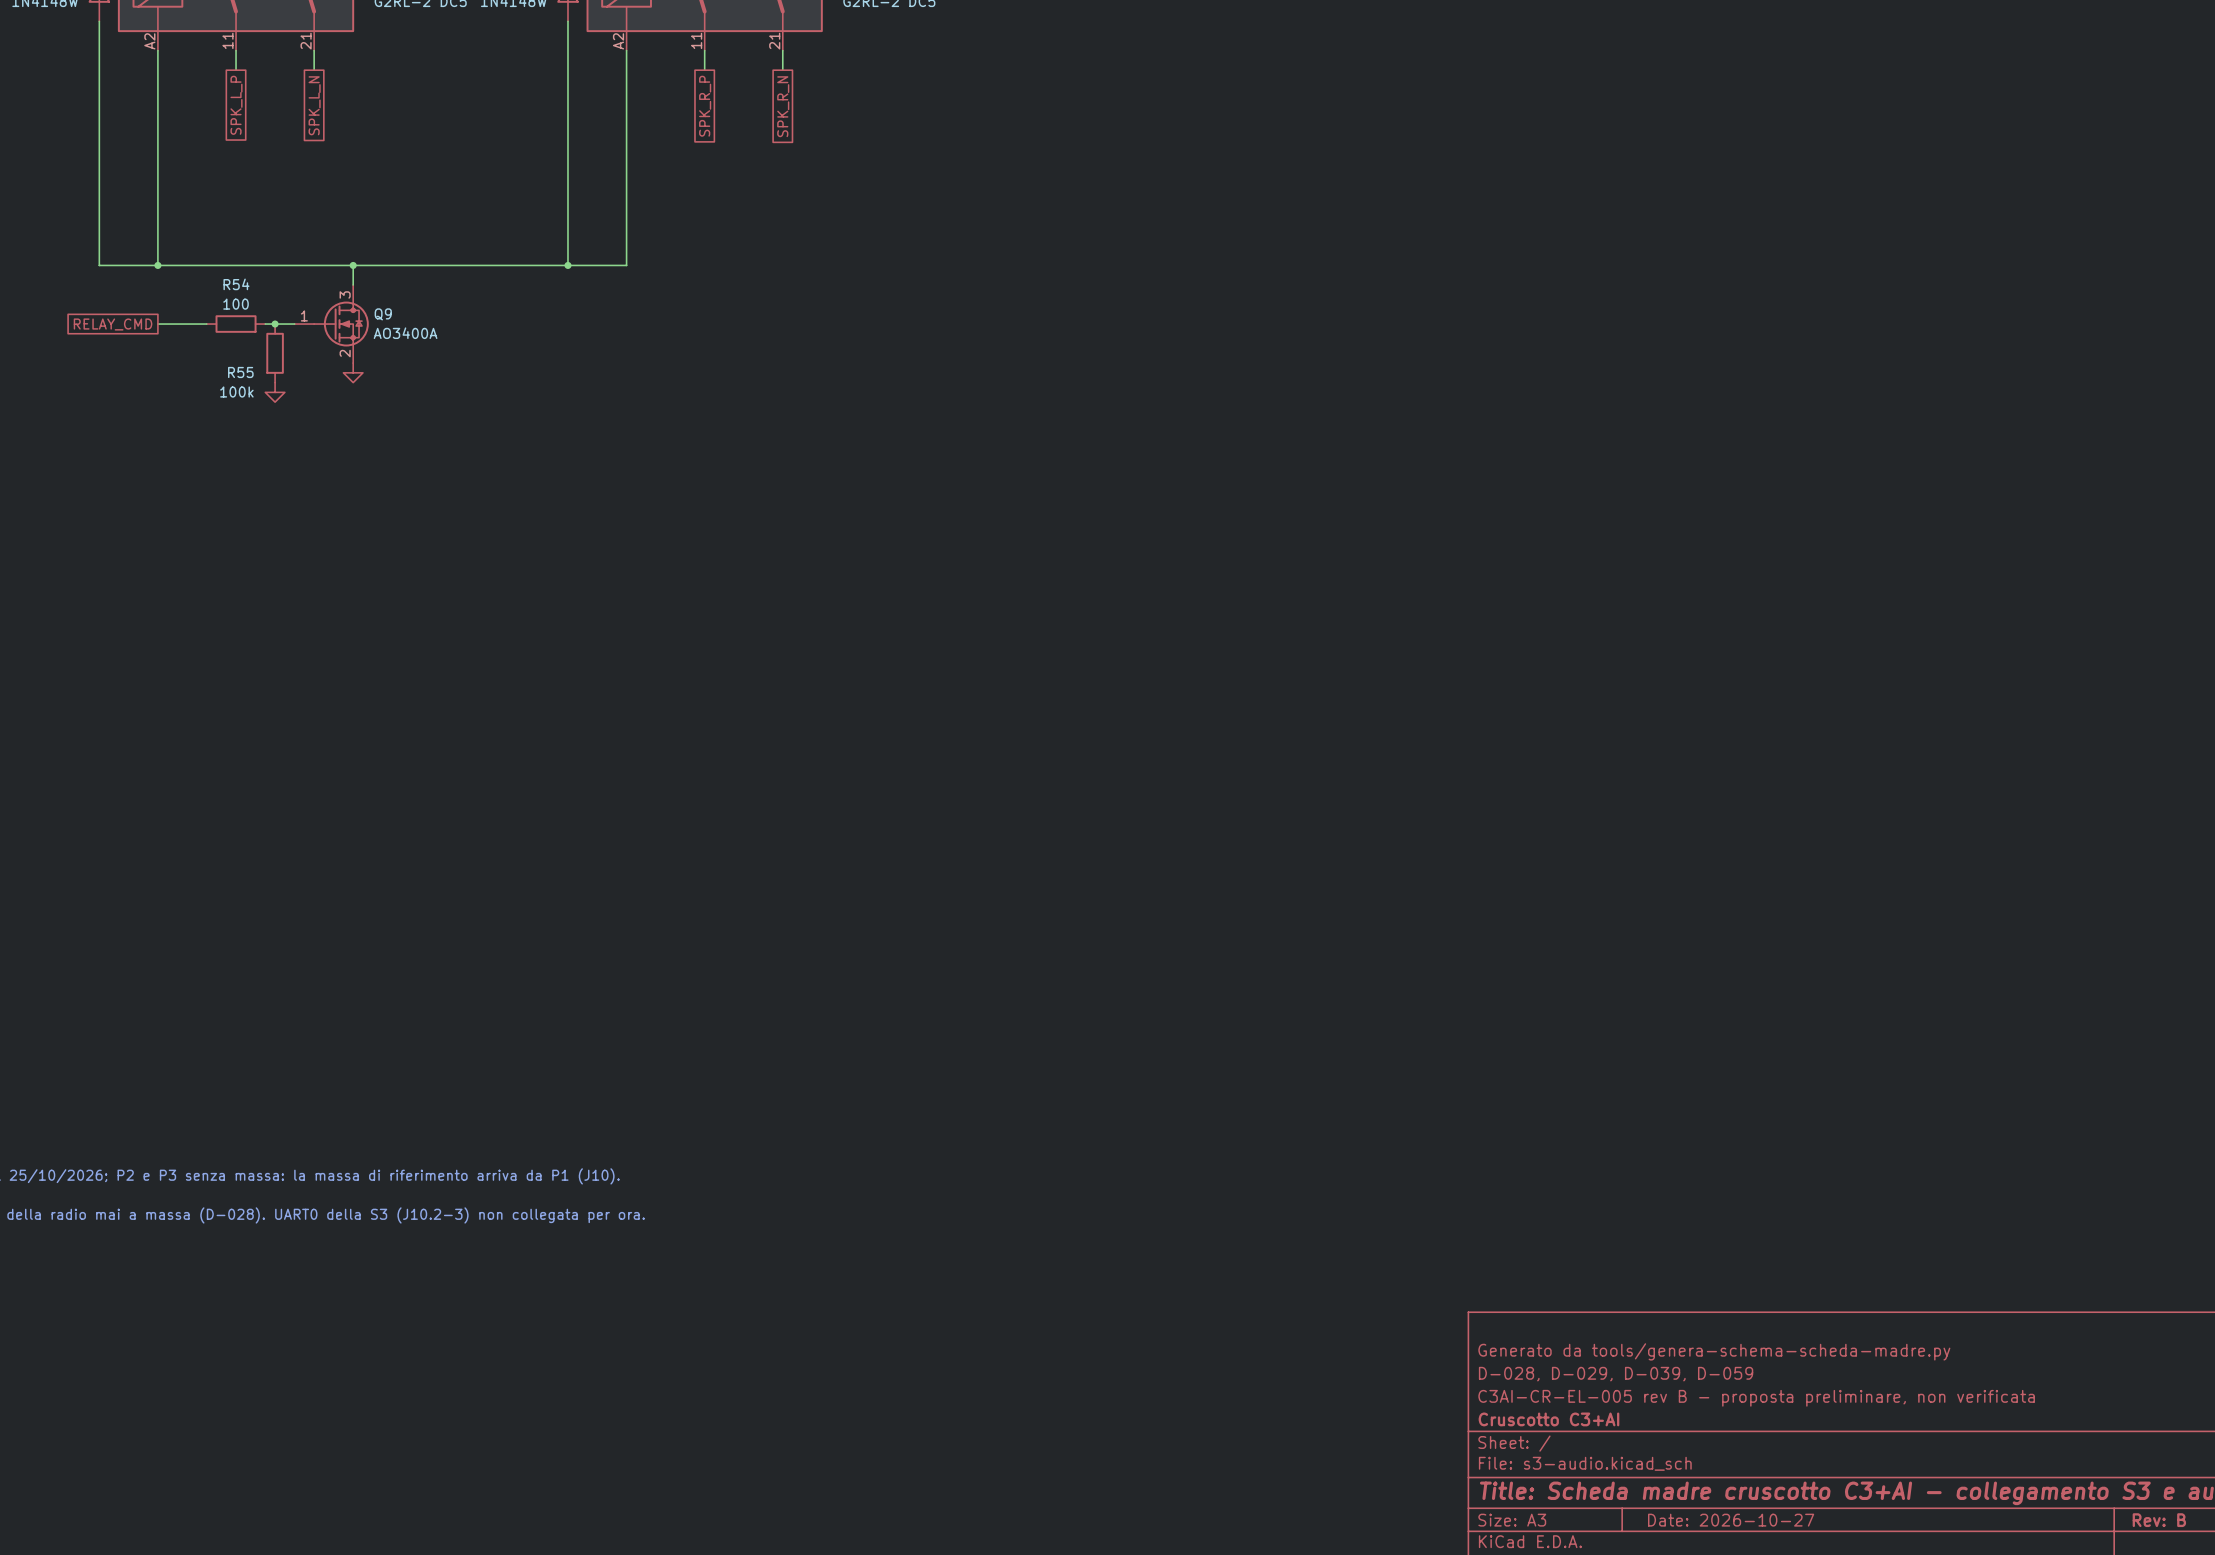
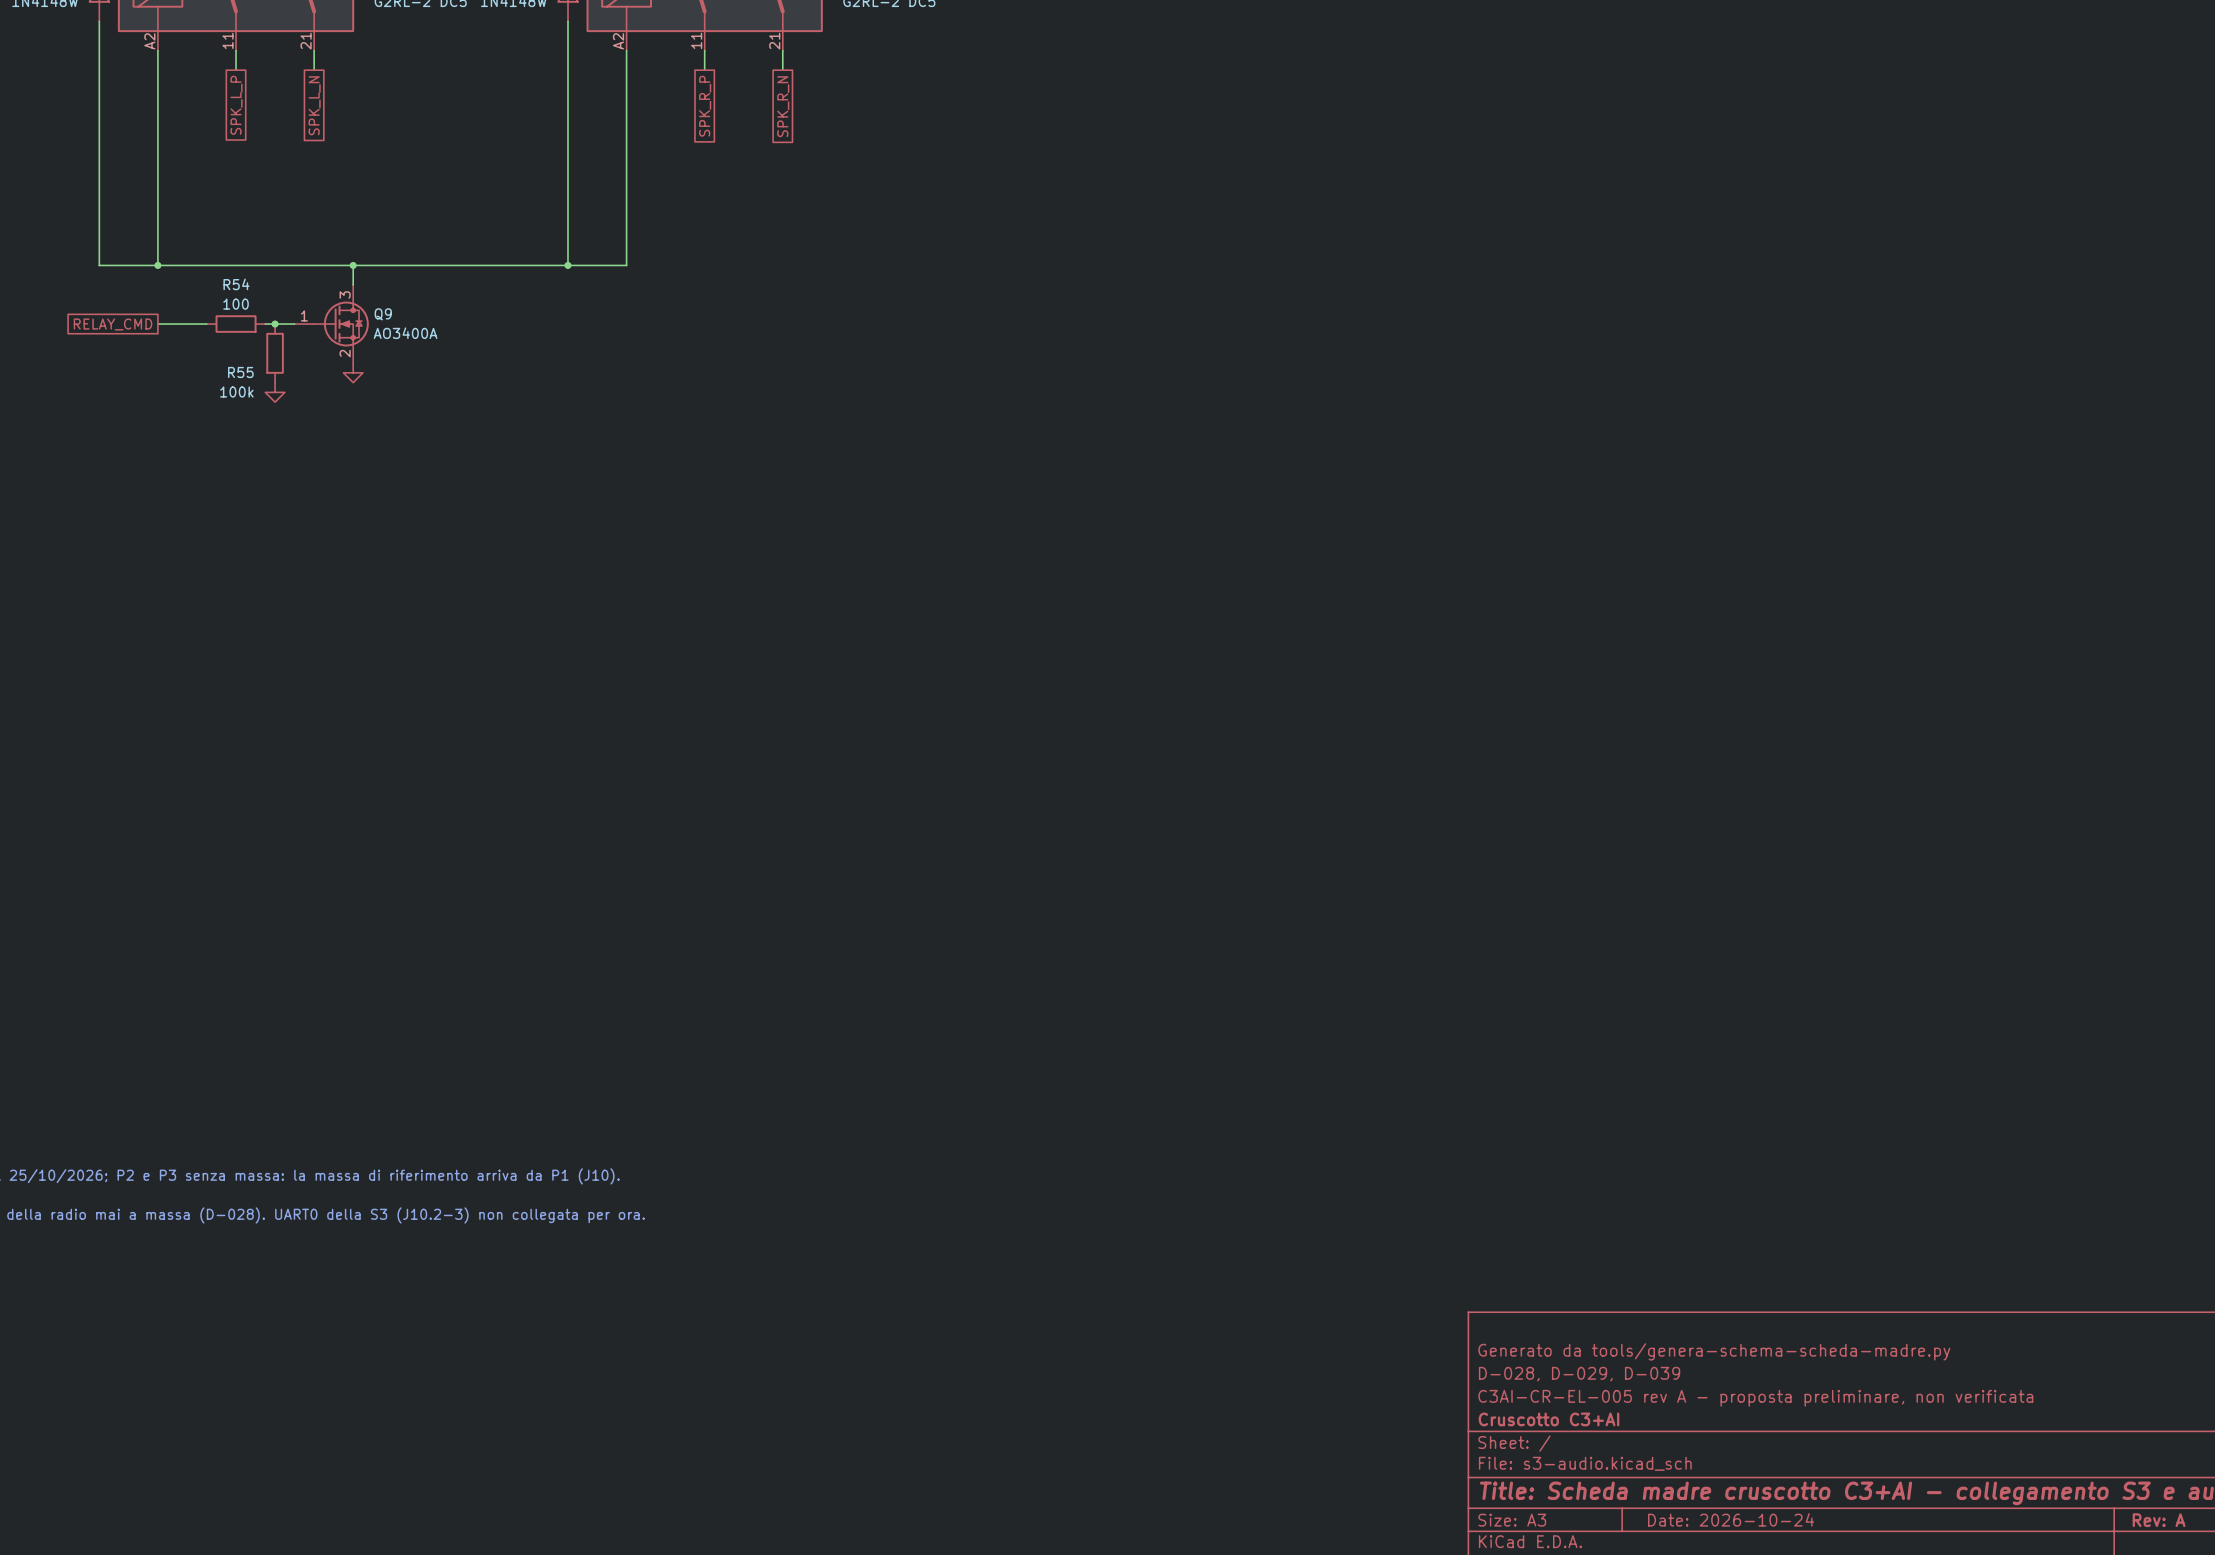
title block: D-028, D-029, D-039, D-059 (1616, 1374) -> D-028, D-029, D-039 (1579, 1374)
title block: C3AI-CR-EL-005 rev B - proposta preliminare, non verificata (1756, 1398) -> C3AI-CR-EL-005 rev A - proposta preliminare, non verificata (1755, 1398)
title block: Date: 2026-10-27 (1731, 1520) -> Date: 2026-10-24 (1731, 1519)
title block: Rev: B (2159, 1520) -> Rev: A (2159, 1520)

